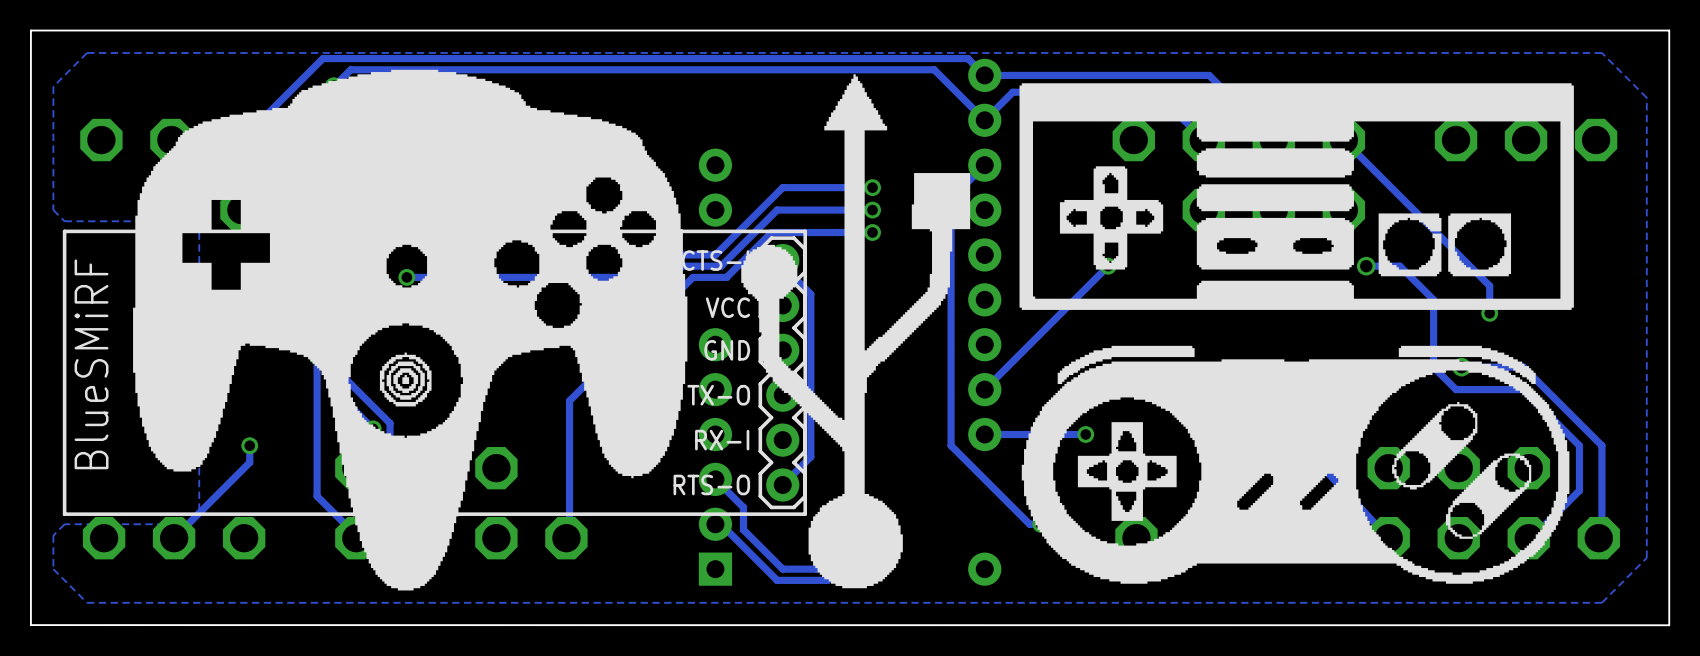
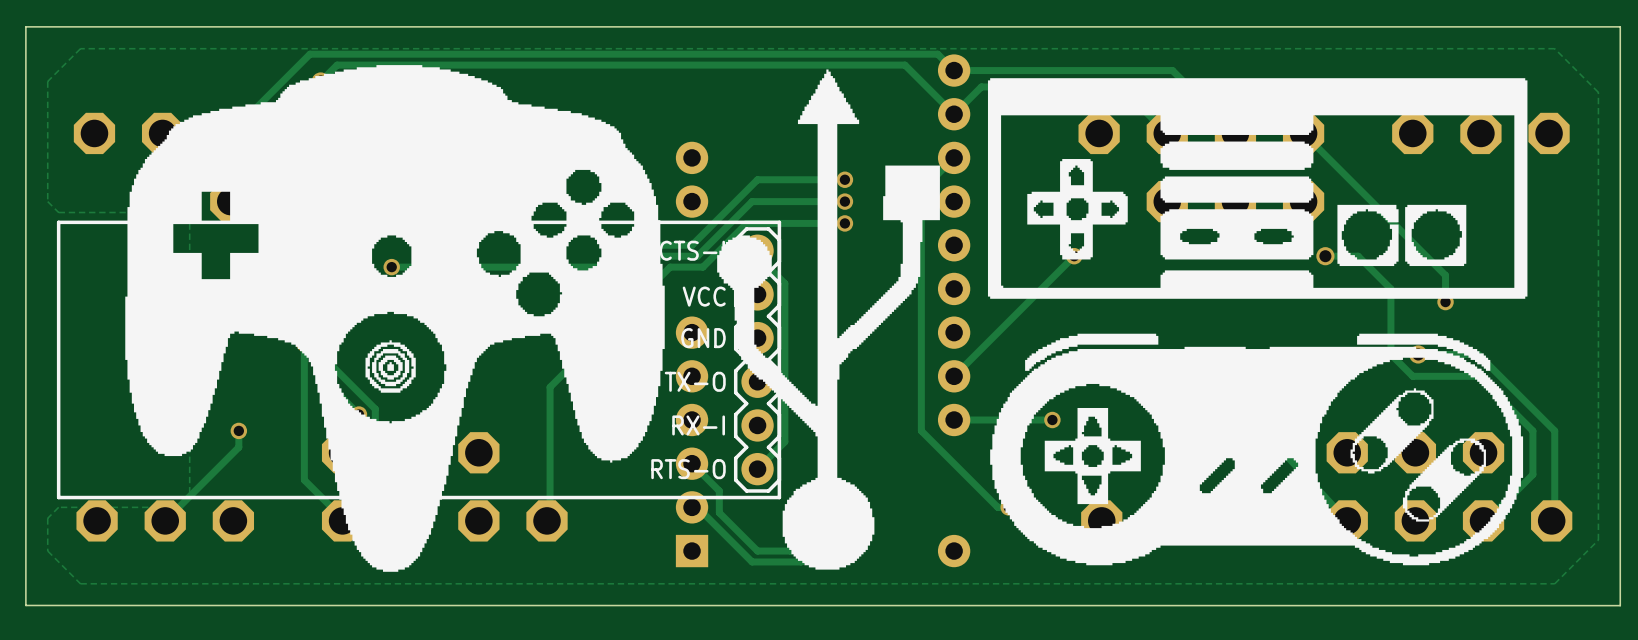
text: BlueSMiRF (91, 364) -> none

